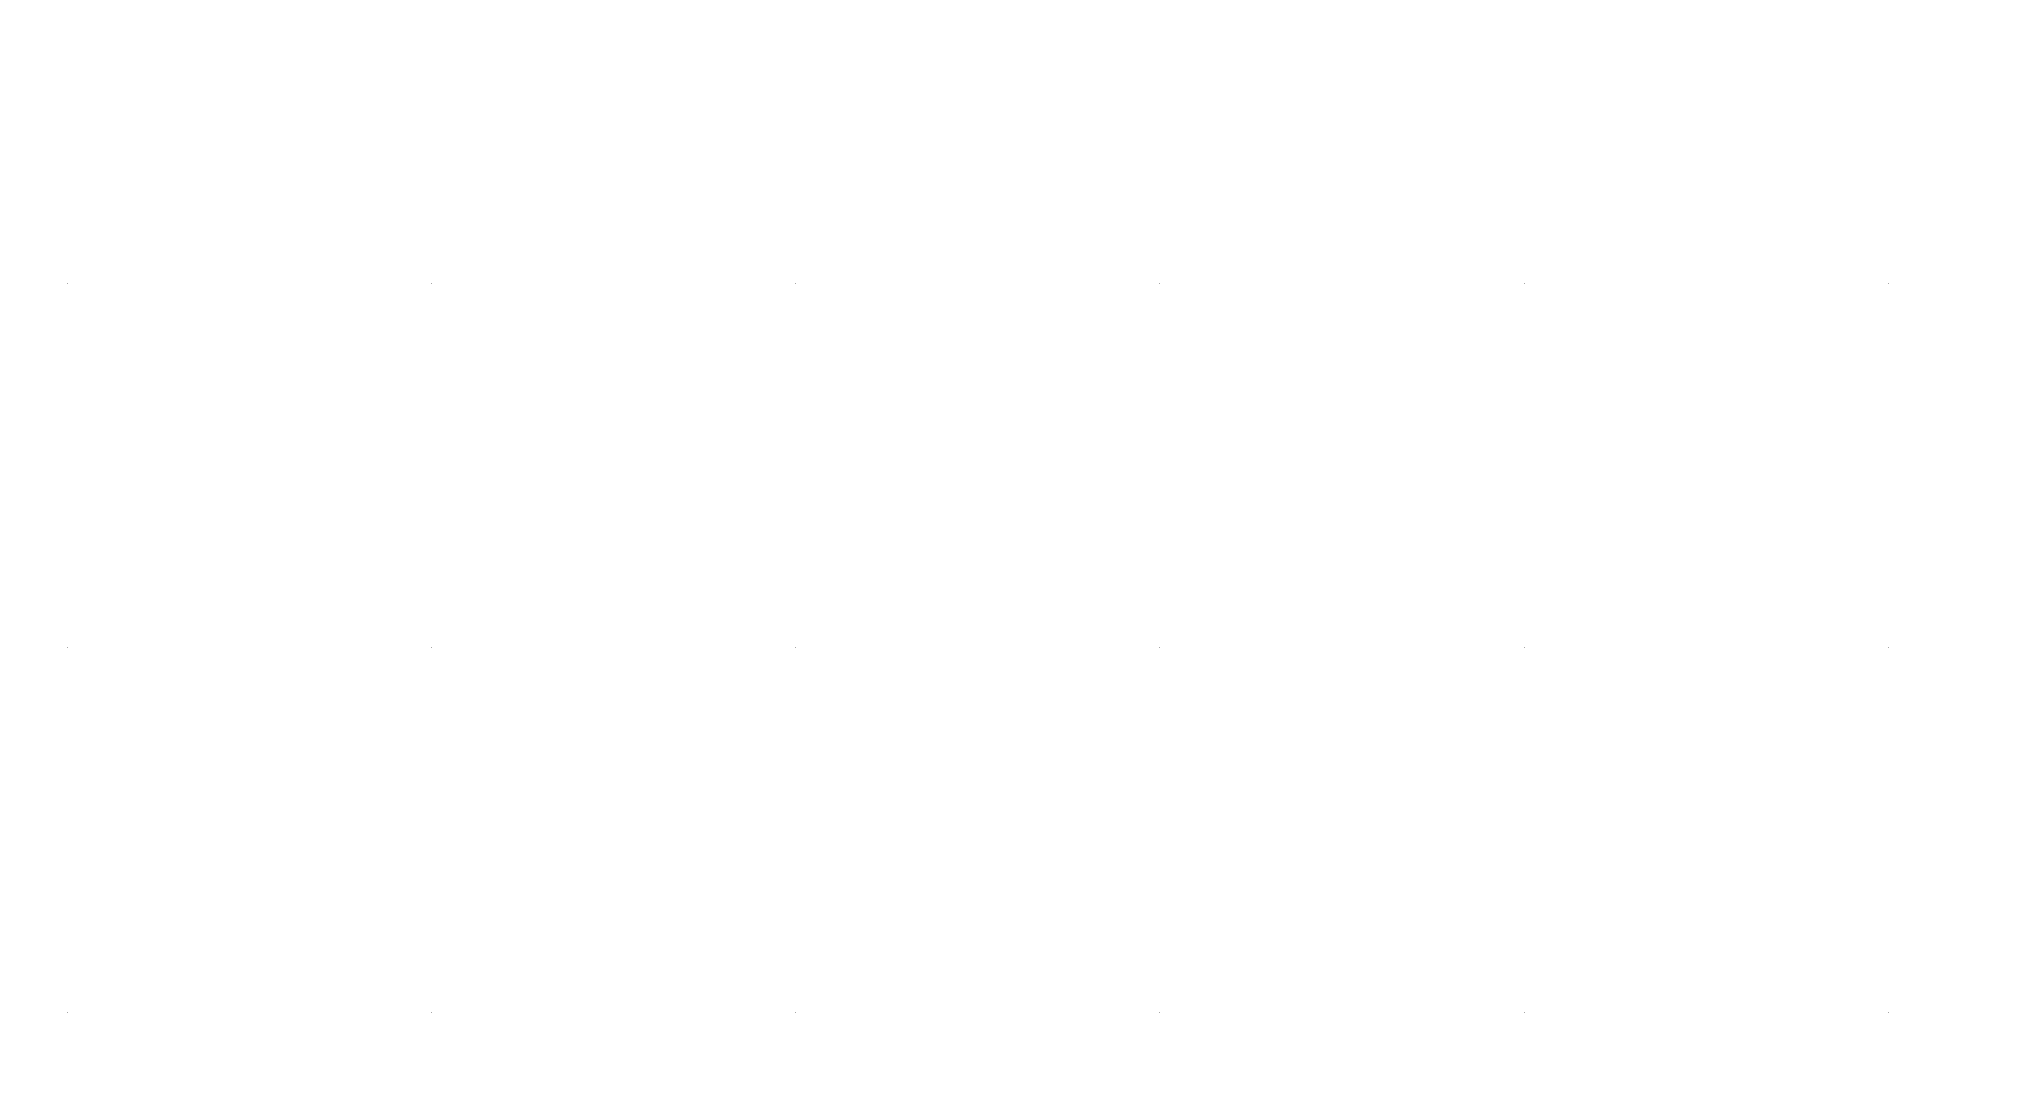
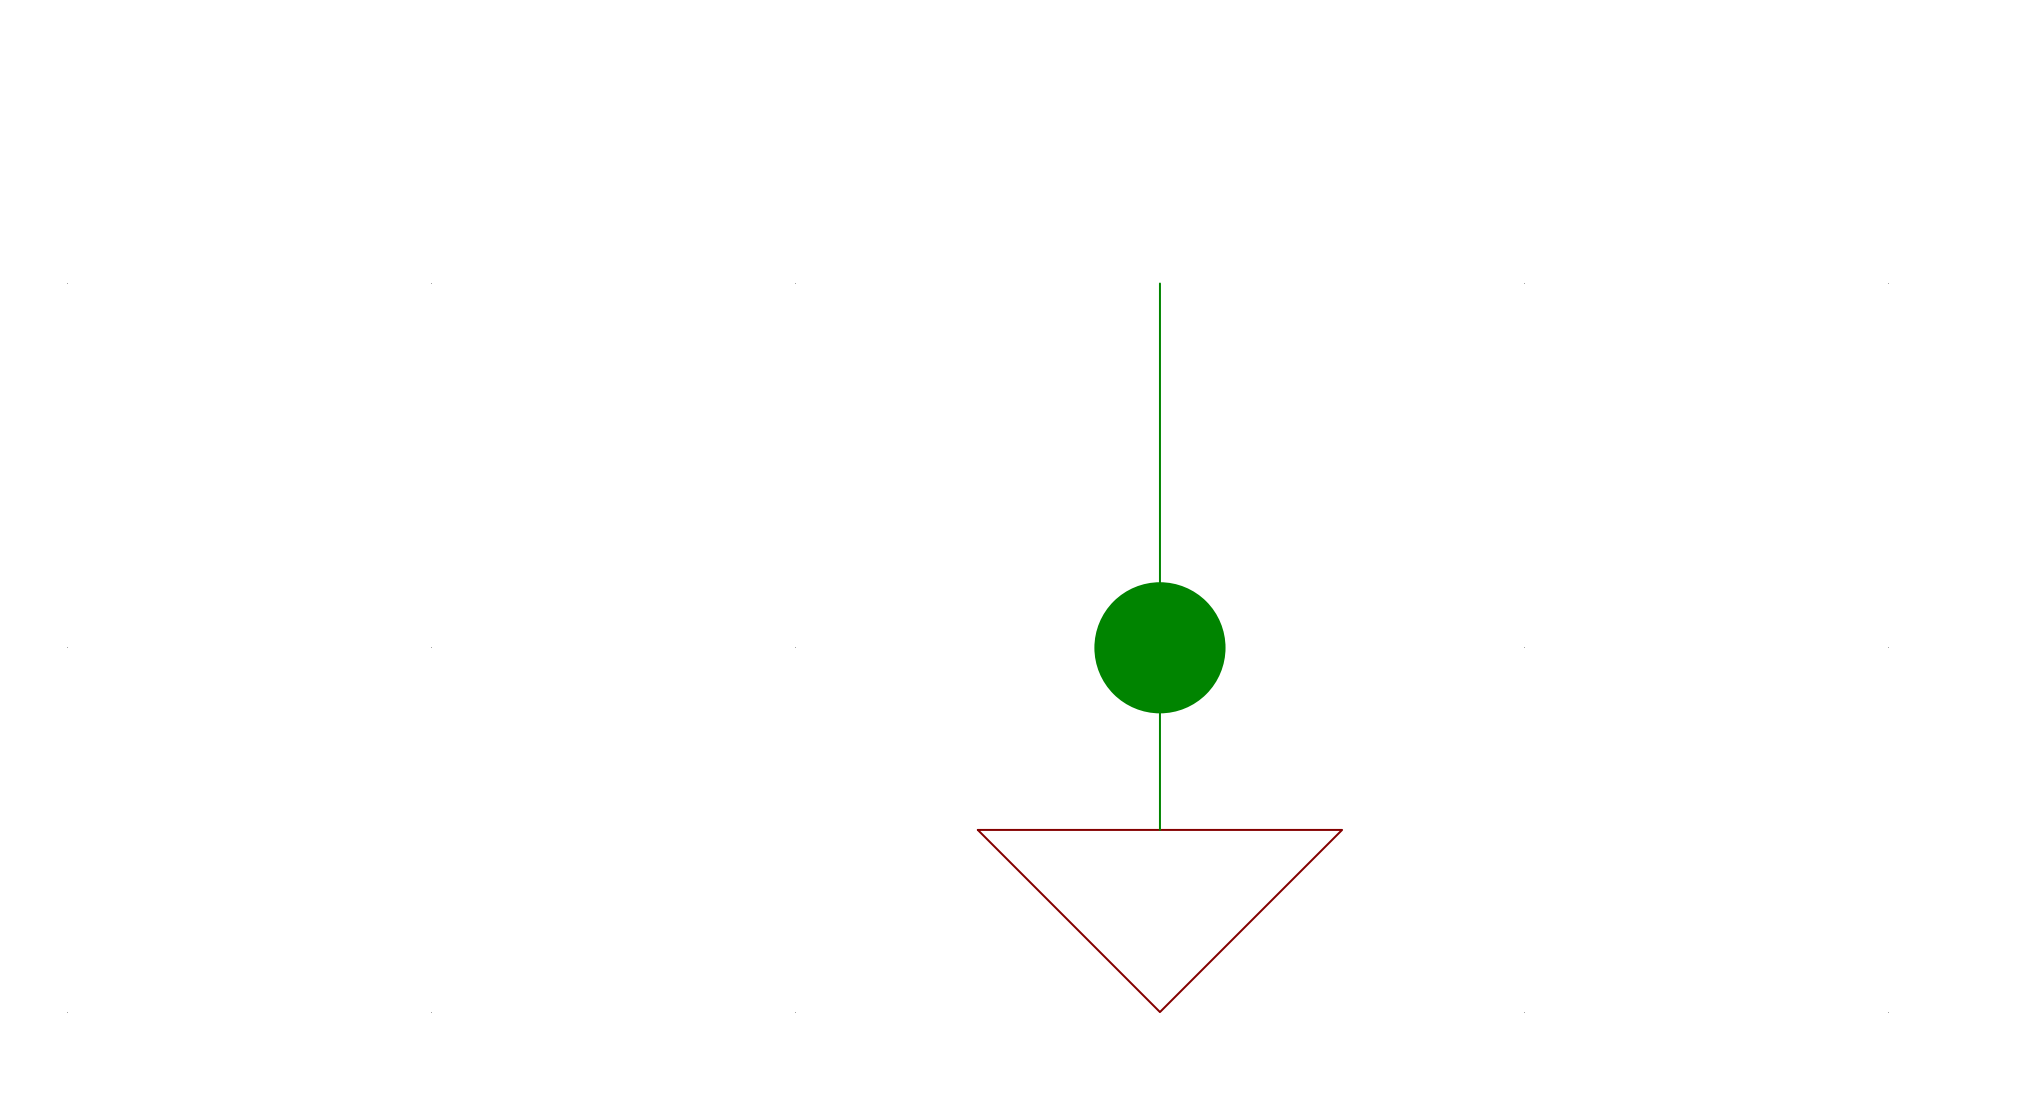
wire: none -> (1159, 283) (1159, 829)
junction: none -> (1159, 647)
power symbol: none -> (1159, 920)

